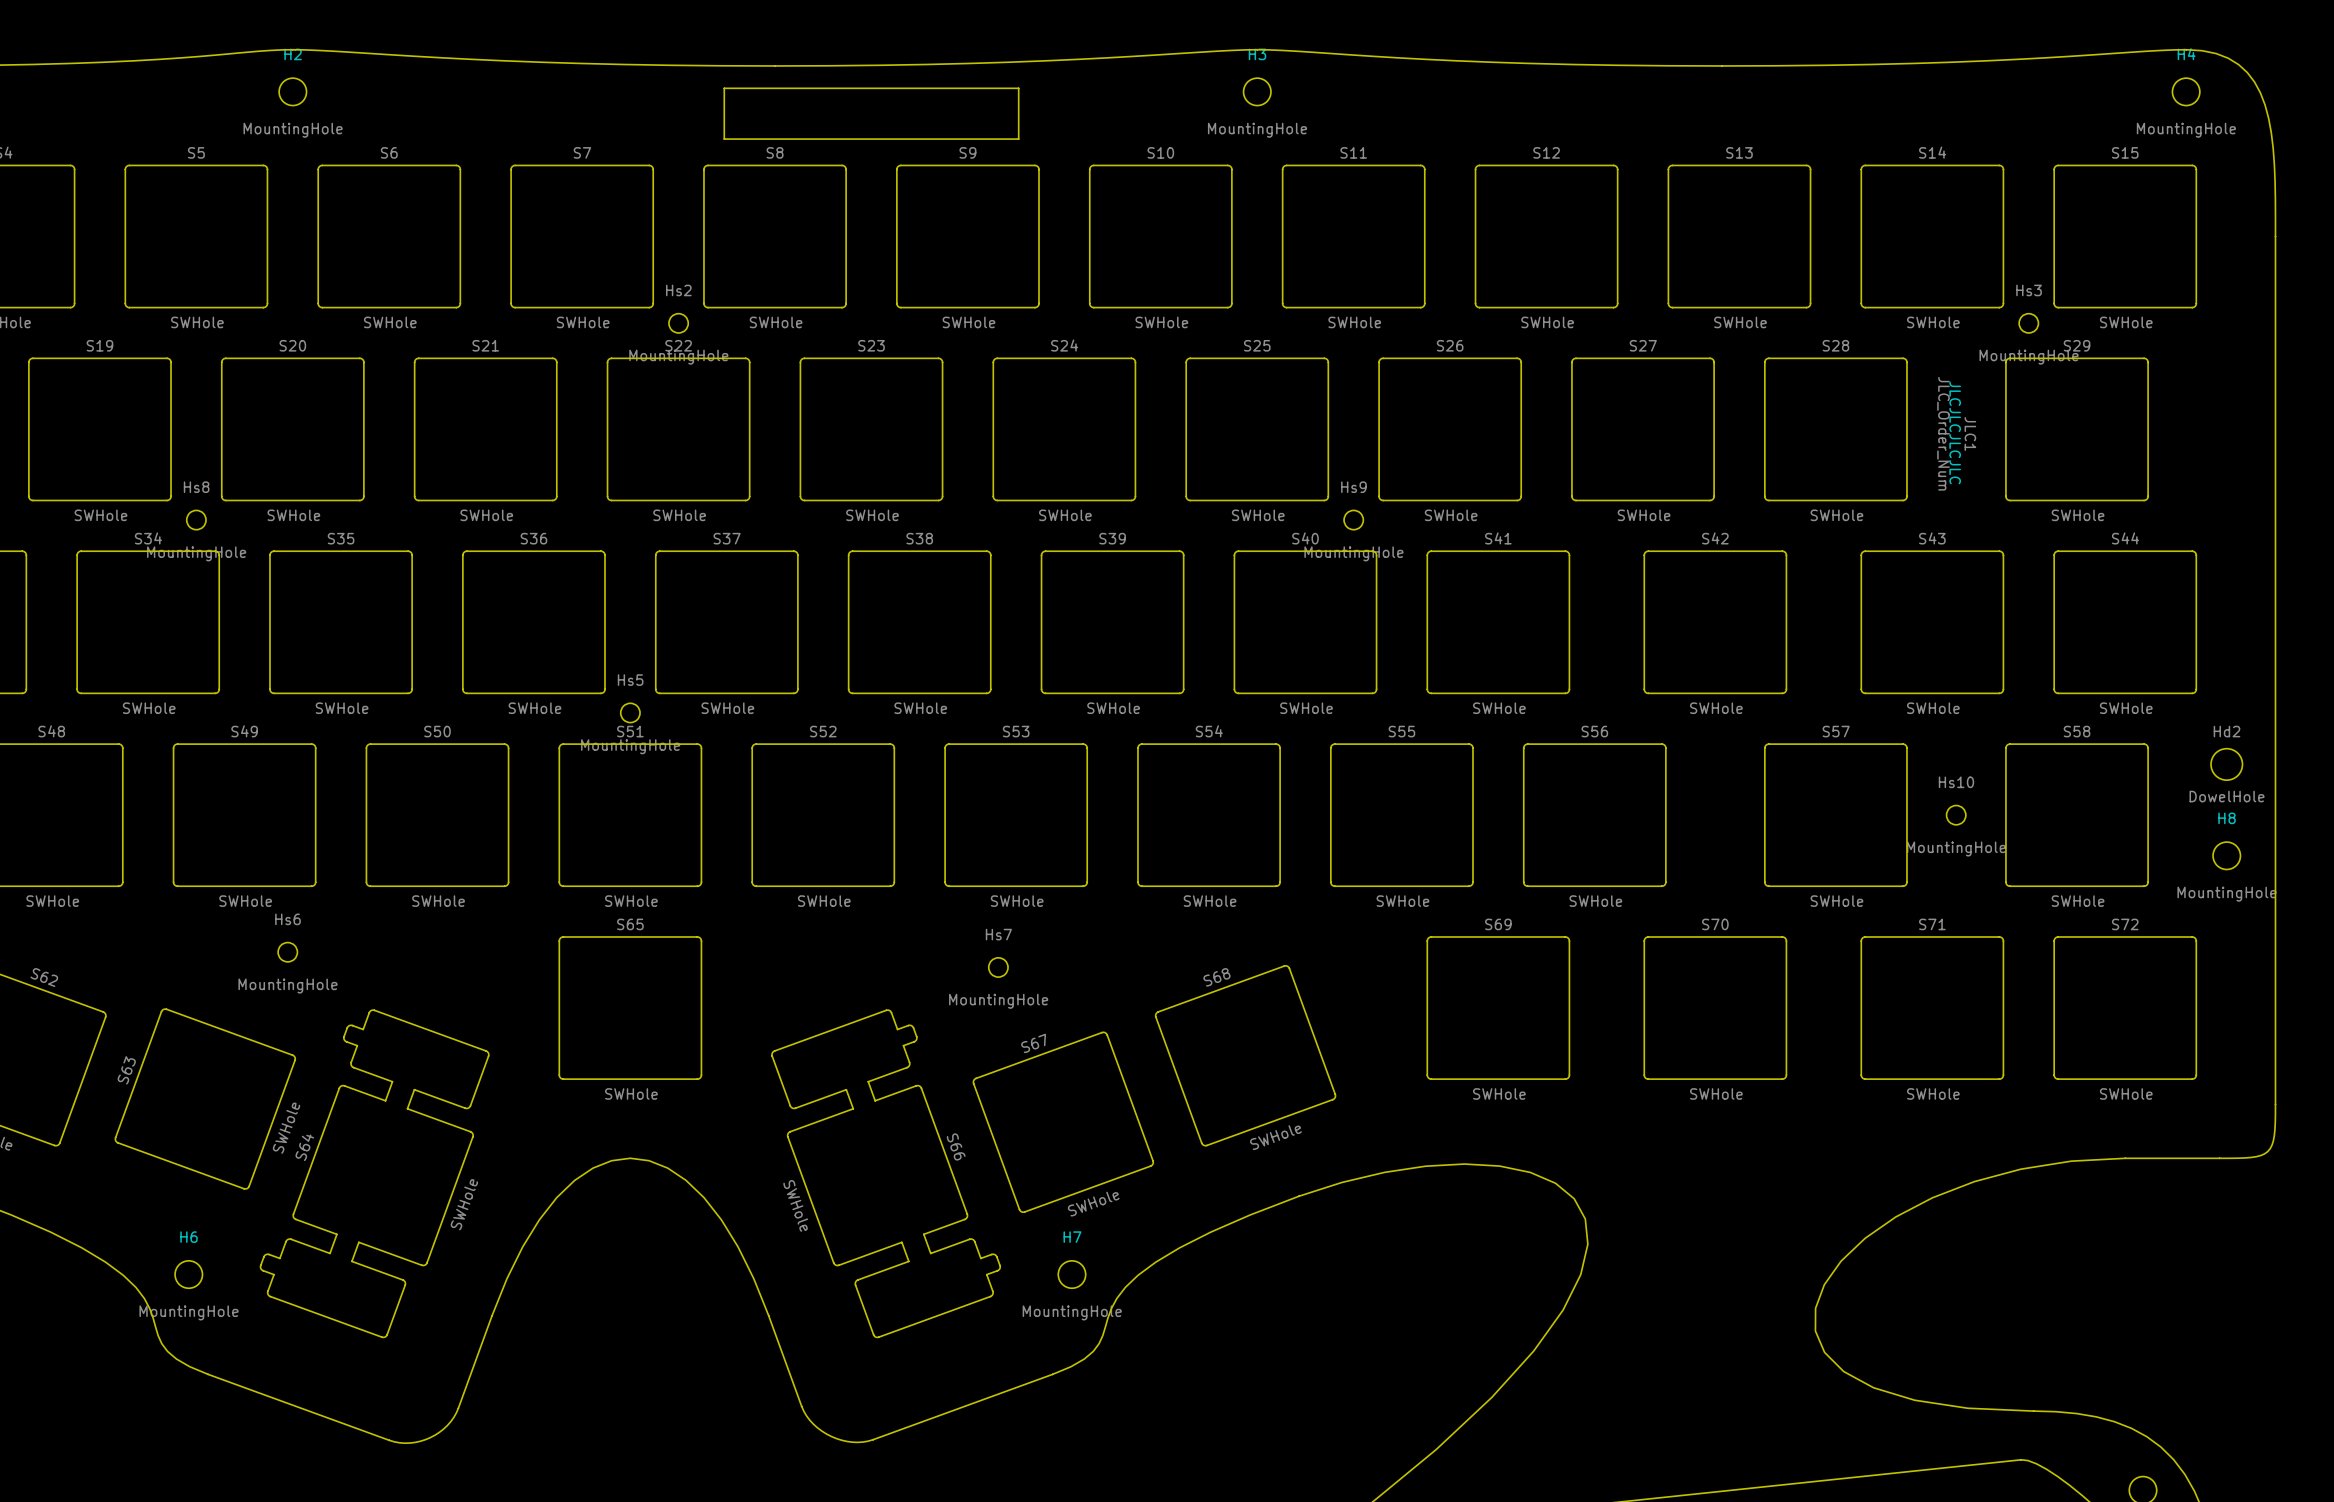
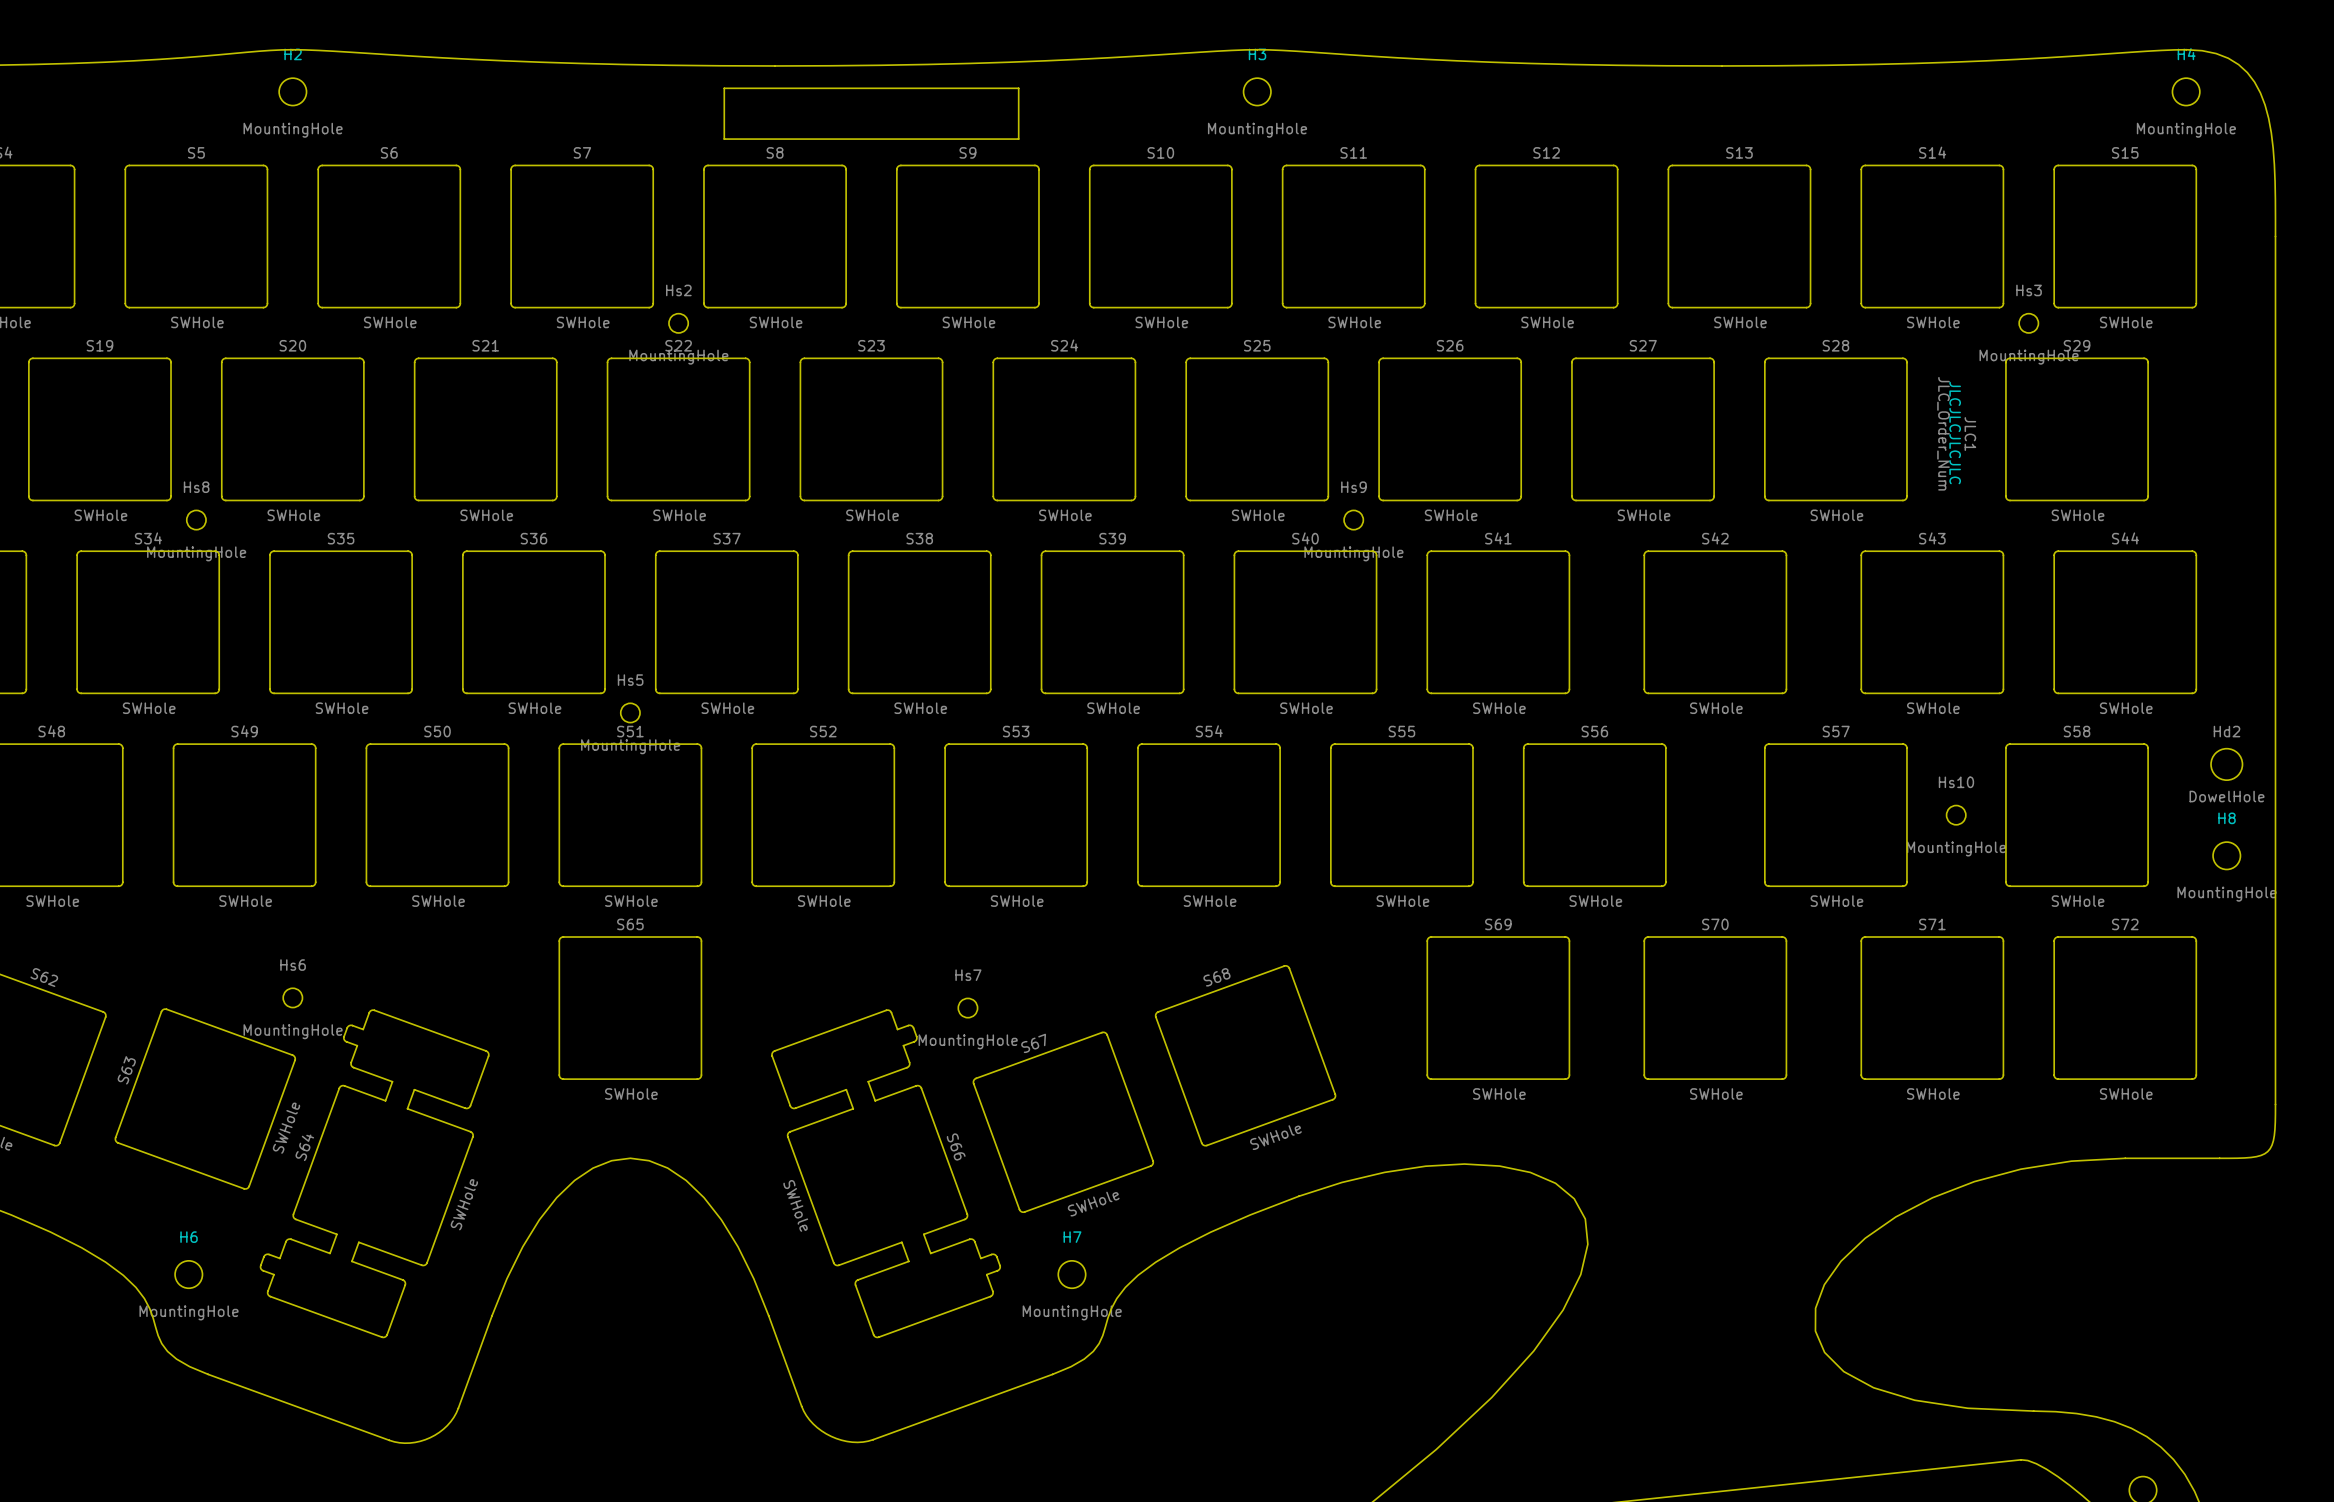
Hs6 position: (287, 952) -> (292, 997)
Hs7 position: (998, 967) -> (967, 1008)

